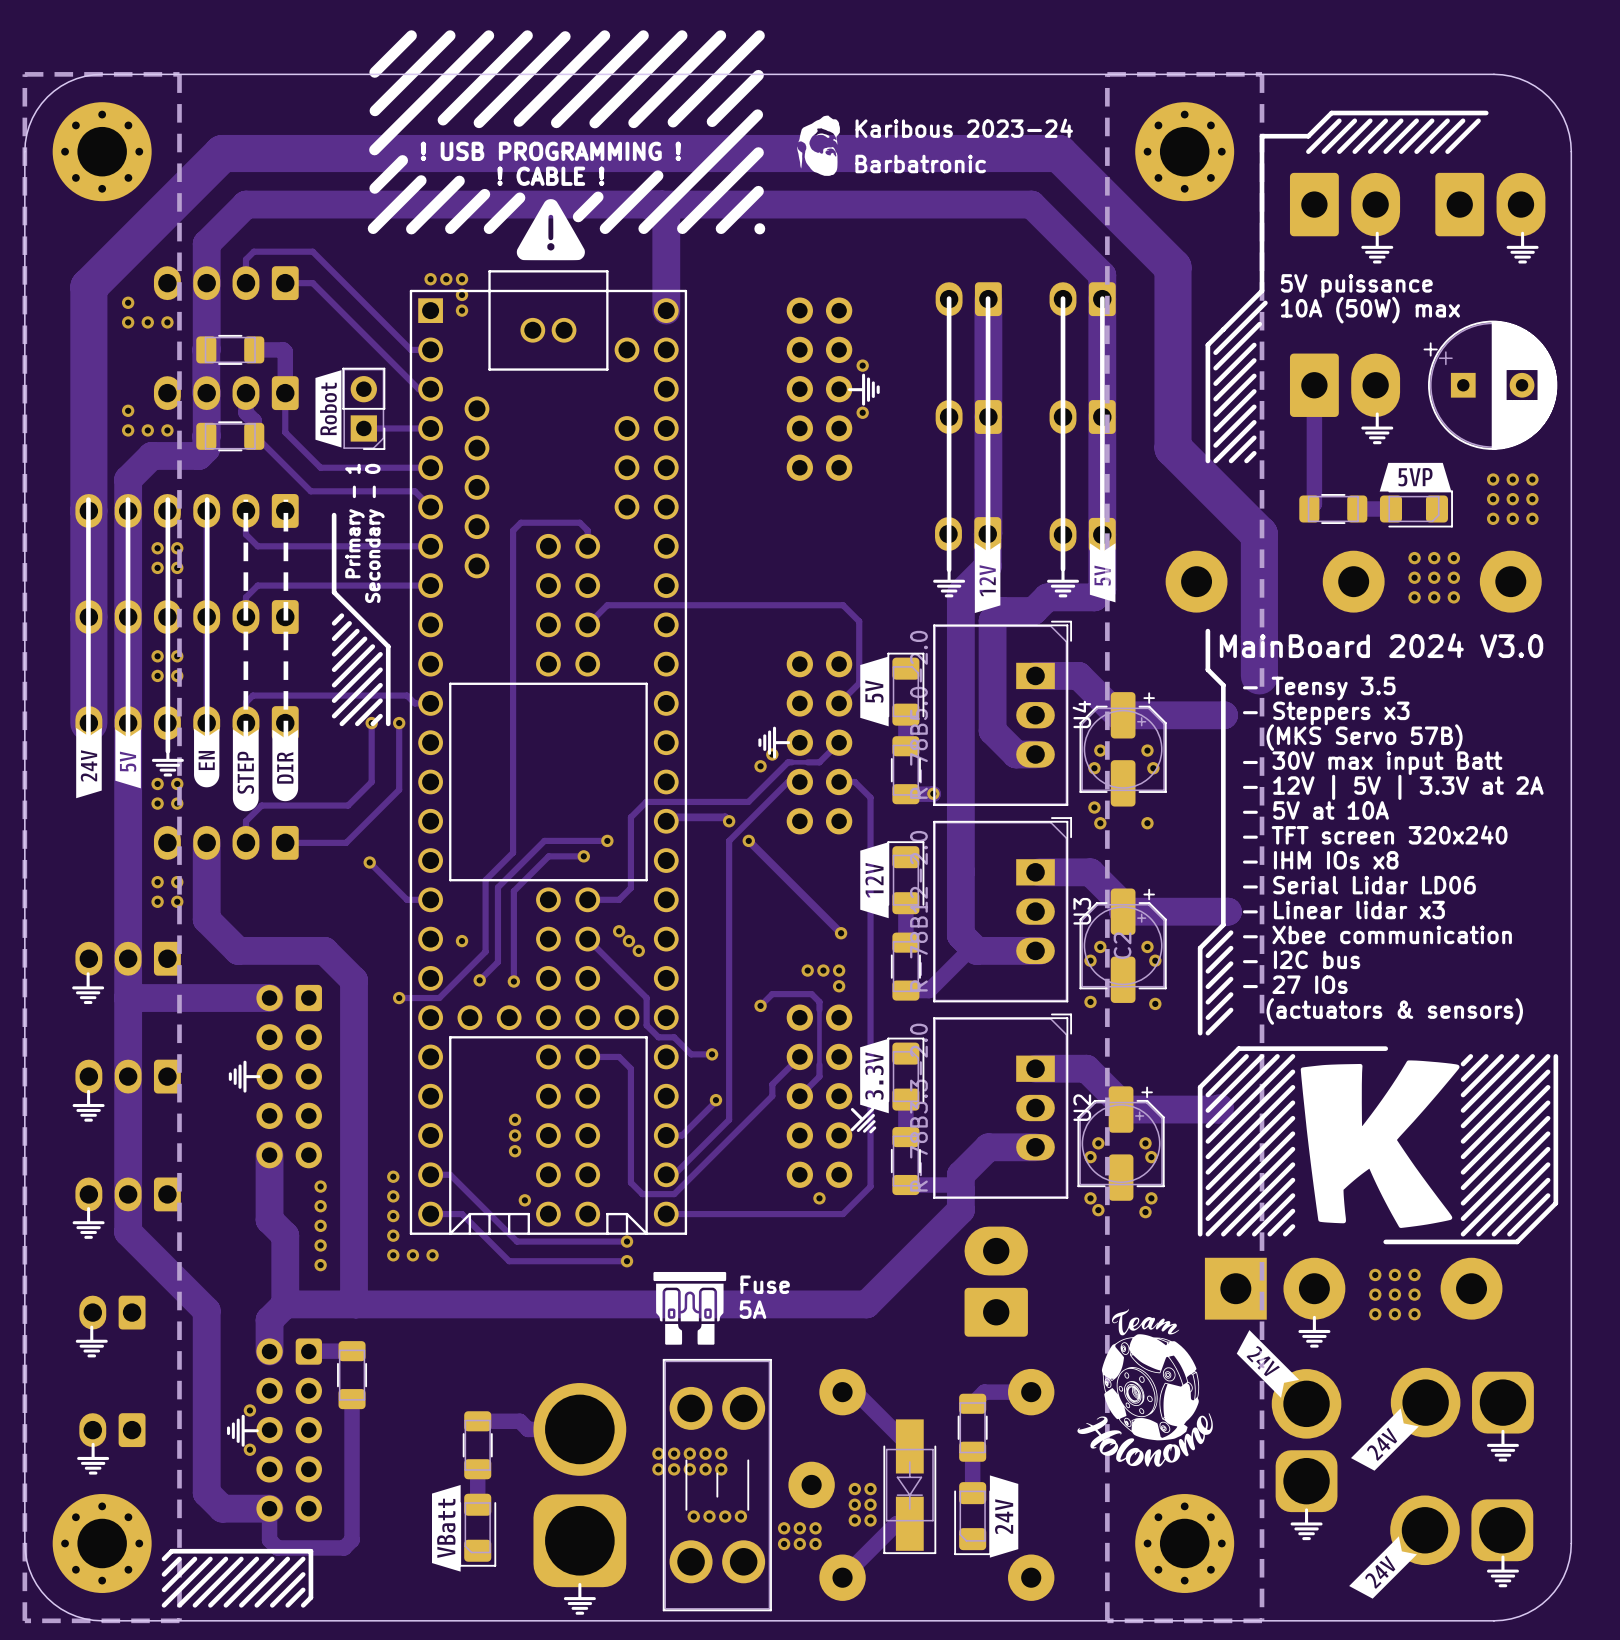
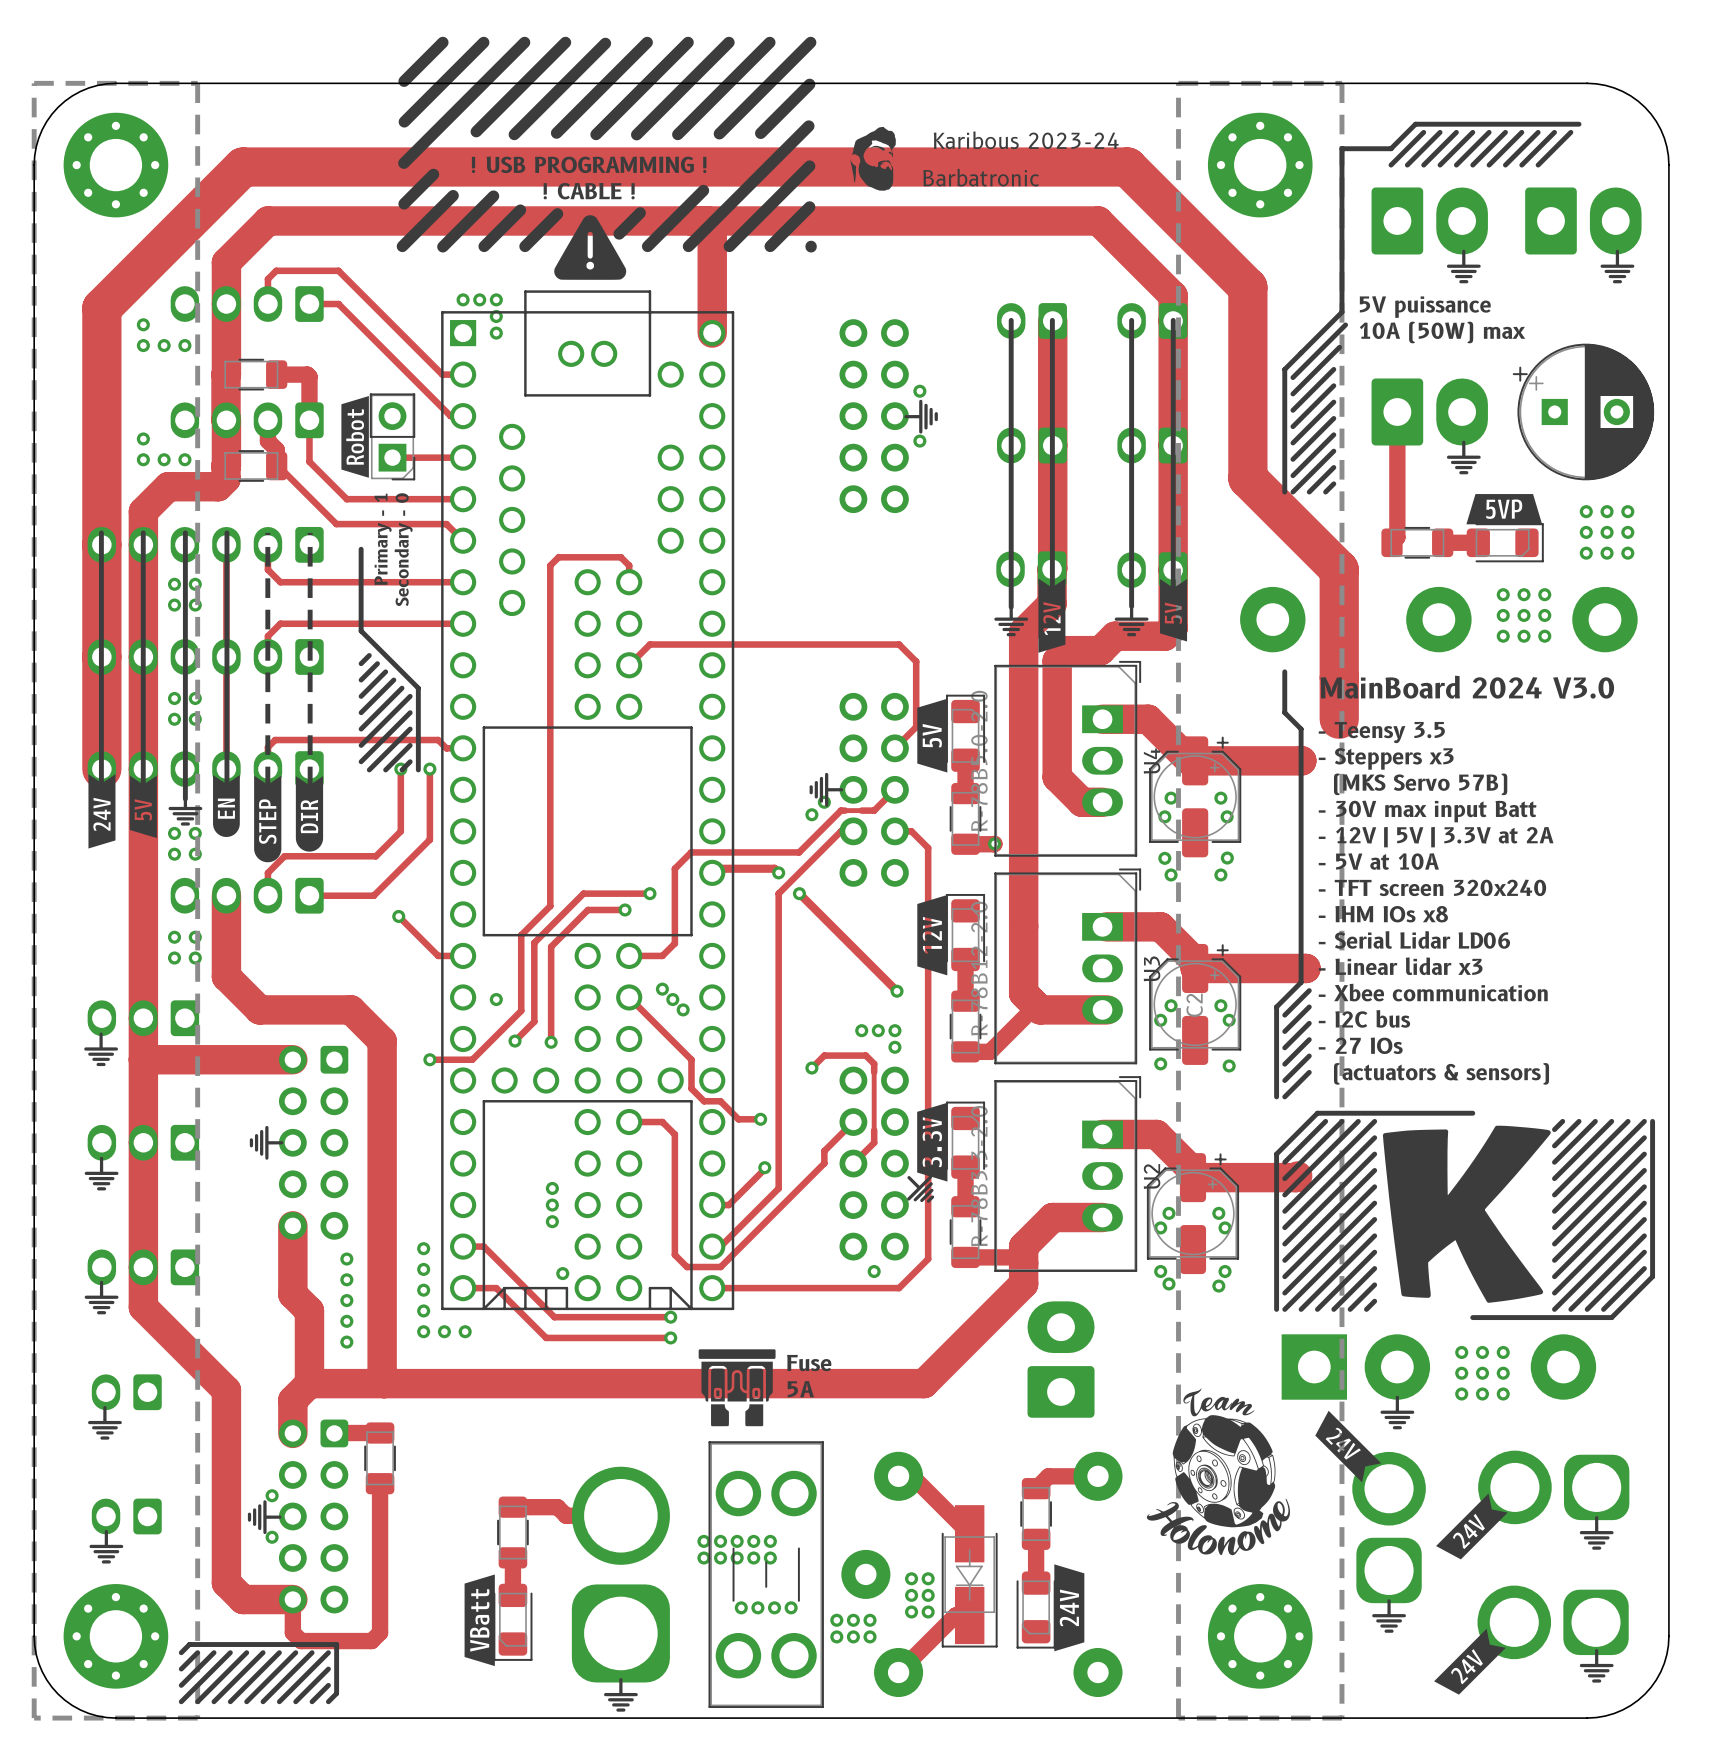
via: none -> (1227, 858)

